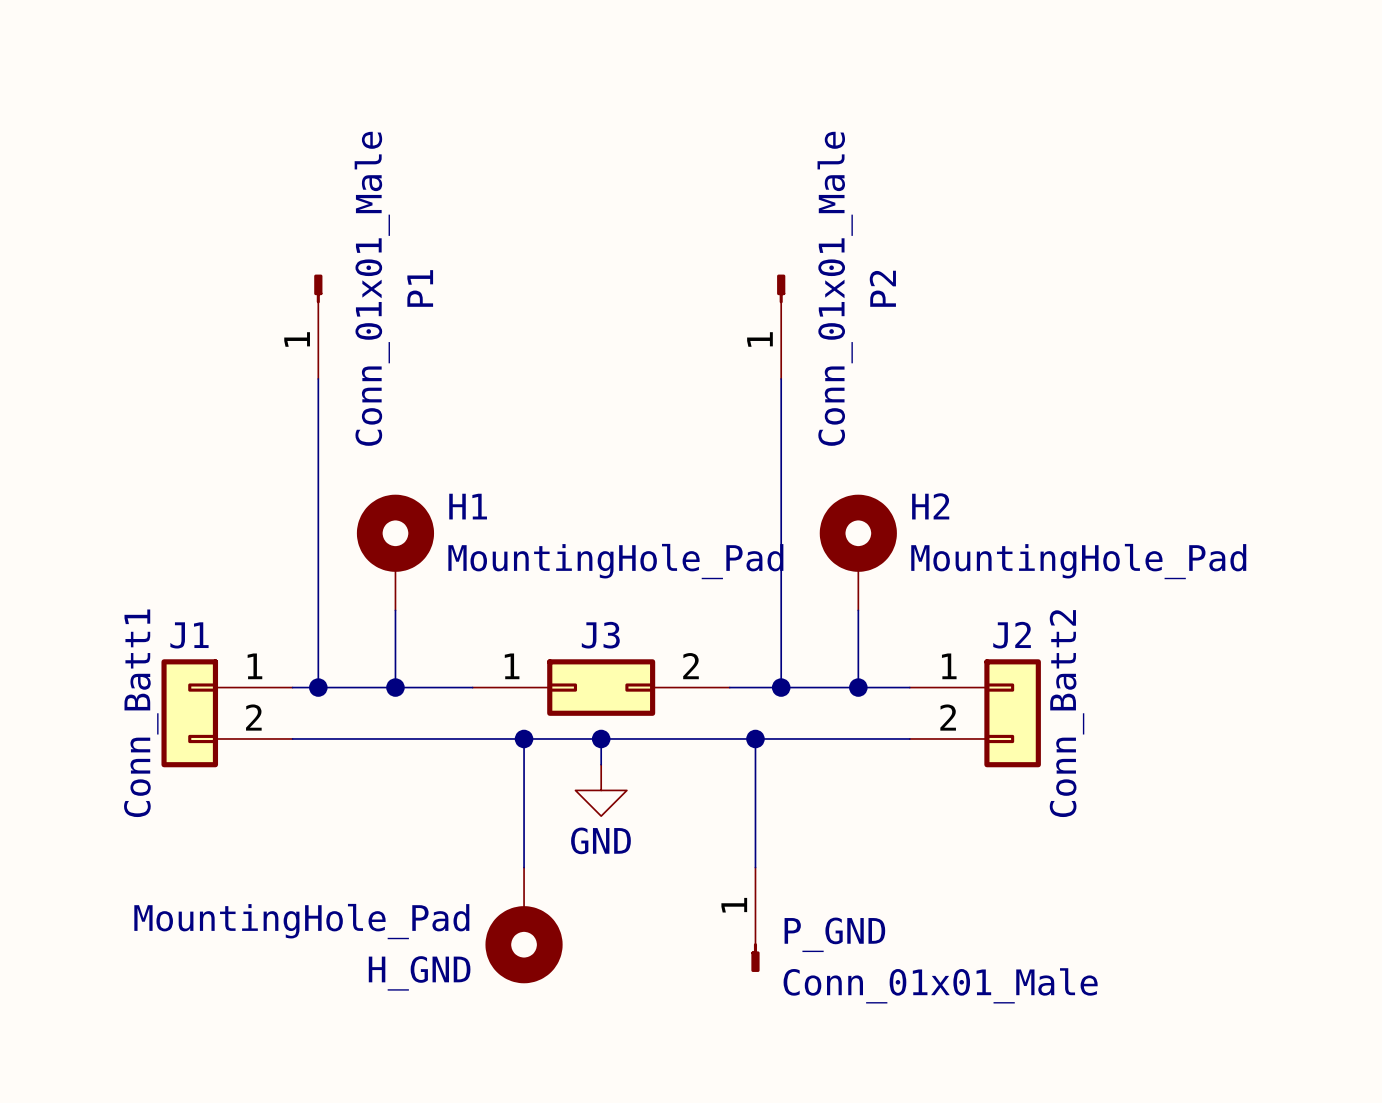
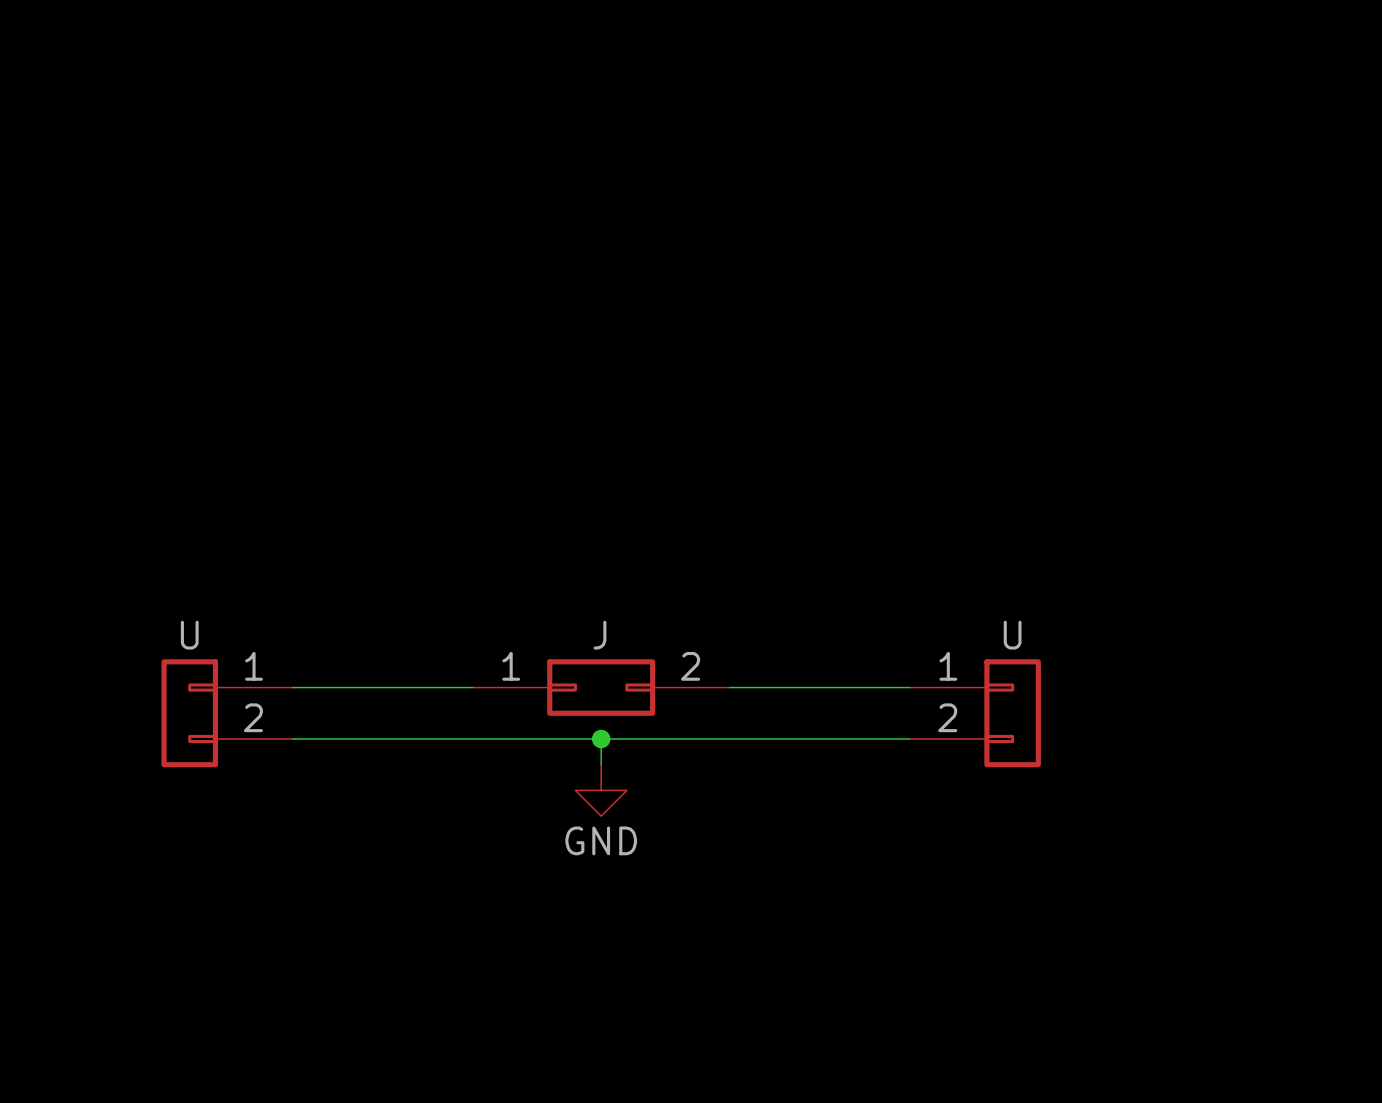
P1: Conn_01x01_Male (318, 326) -> none
P2: Conn_01x01_Male (781, 326) -> none
wire: (318, 378) (318, 687) -> none
wire: (781, 378) (781, 687) -> none
H1: MountingHole_Pad (395, 552) -> none
H2: MountingHole_Pad (858, 552) -> none
wire: (395, 610) (395, 687) -> none
wire: (858, 610) (858, 687) -> none
J1 name: J1 (189, 635) -> U (189, 635)
J3 name: J3 (600, 635) -> J (599, 635)
J2 name: J2 (1012, 635) -> U (1012, 635)
junction: (318, 687) -> none
junction: (395, 687) -> none
junction: (781, 687) -> none
junction: (858, 687) -> none
J1 value: Conn_Batt1 (141, 713) -> none
J2 value: Conn_Batt2 (1067, 713) -> none
wire: (524, 738) (524, 867) -> none
junction: (524, 738) -> none
wire: (755, 738) (755, 867) -> none
junction: (755, 738) -> none
P_GND: Conn_01x01_Male (755, 919) -> none
H_GND: MountingHole_Pad (524, 925) -> none

